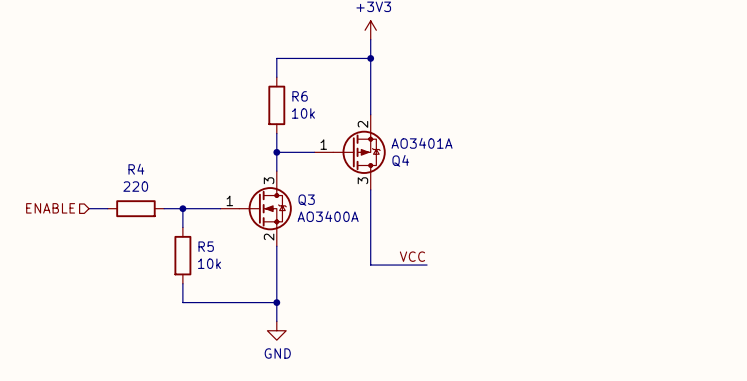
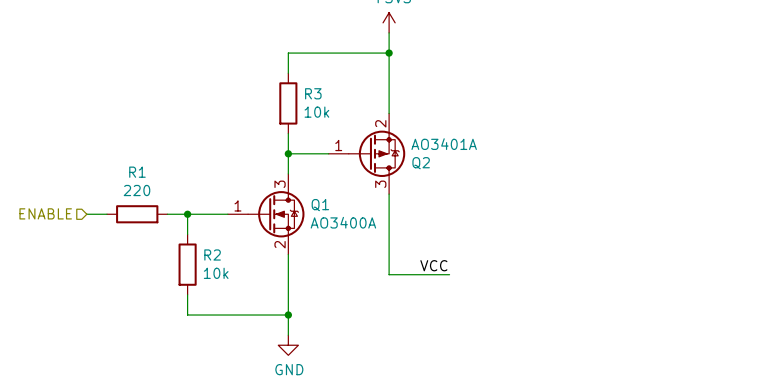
R6 name: R6 (300, 96) -> R3 (313, 93)
Q4 name: Q4 (400, 160) -> Q2 (421, 163)
R4 name: R4 (136, 169) -> R1 (137, 172)
Q3 name: Q3 (306, 200) -> Q1 (320, 205)
R5 name: R5 (206, 246) -> R2 (212, 254)

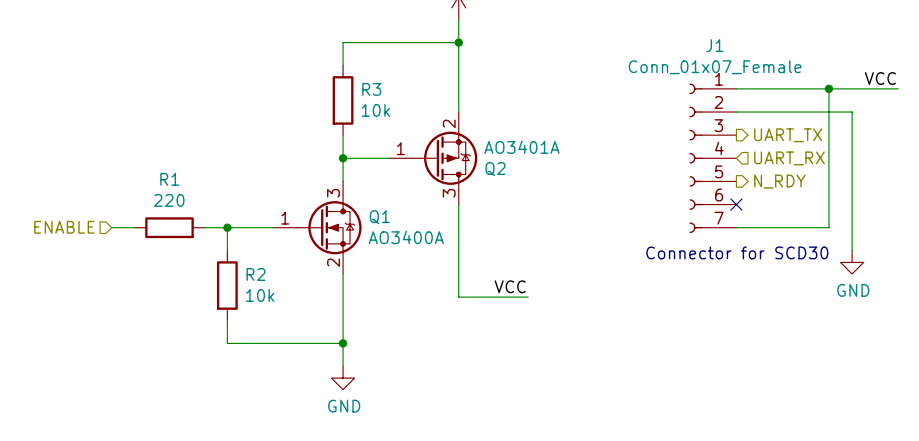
label: none -> VCC (880, 78)
wire: none -> (736, 88) (898, 88)
wire: none -> (828, 88) (828, 227) (736, 227)
junction: none -> (828, 88)
wire: none -> (736, 112) (852, 112) (852, 250)
hierarchical label: none -> UART_TX (788, 135)
J1: none -> Conn_01x07_Female (712, 158)
hierarchical label: none -> UART_RX (789, 158)
hierarchical label: none -> N_RDY (779, 181)
no-connect mark: none -> (736, 204)
text: none -> Connector for SCD30 (737, 252)
power symbol: none -> GND (852, 262)

